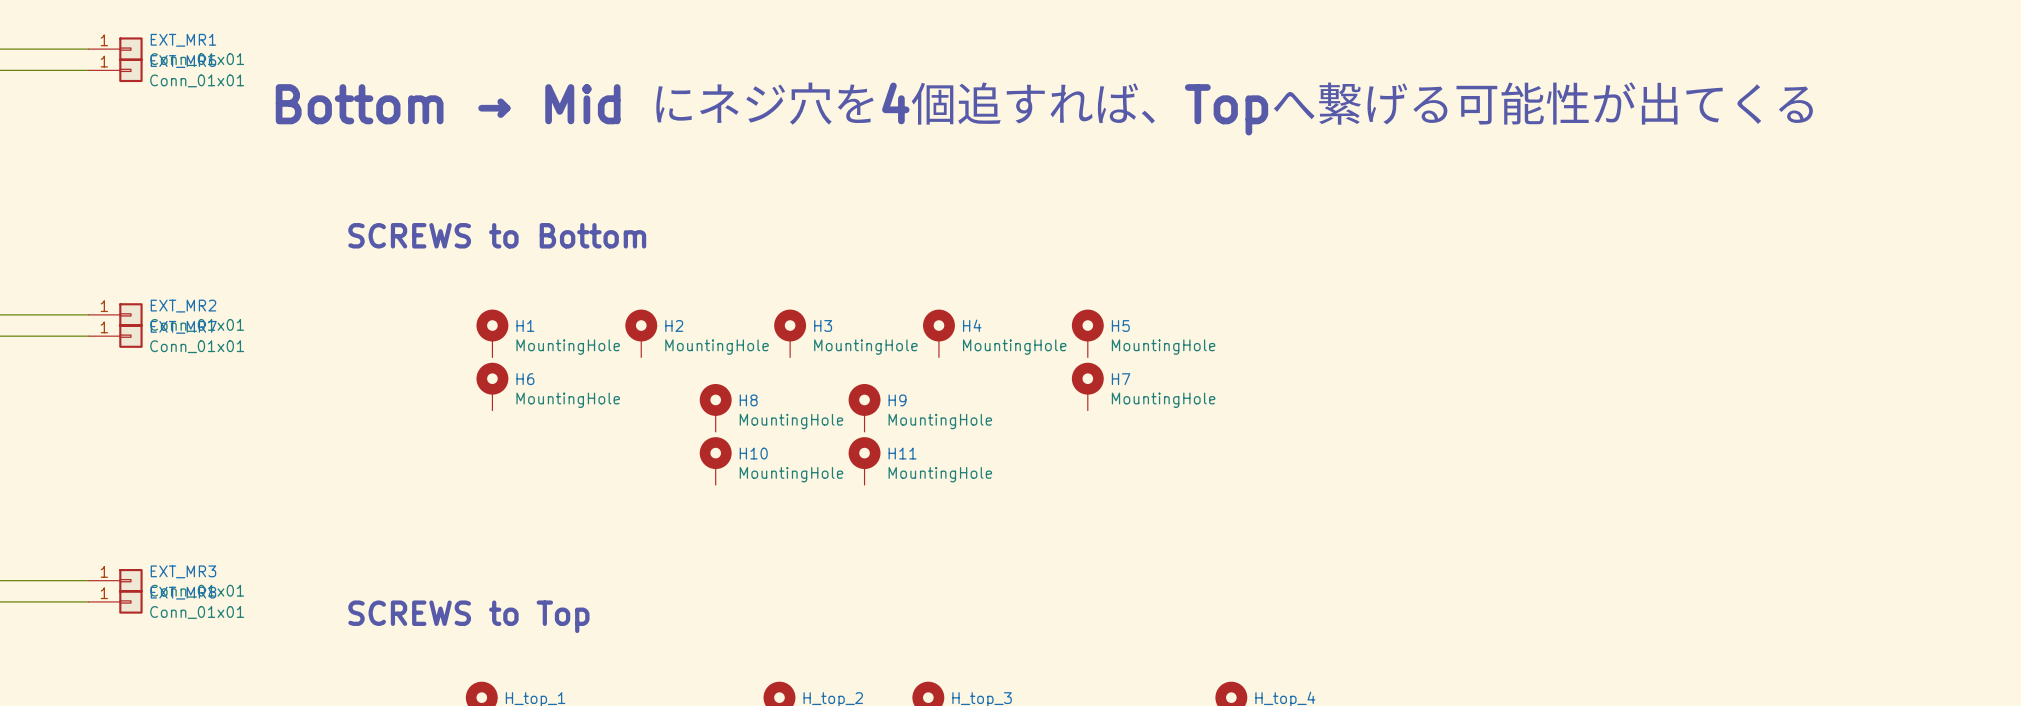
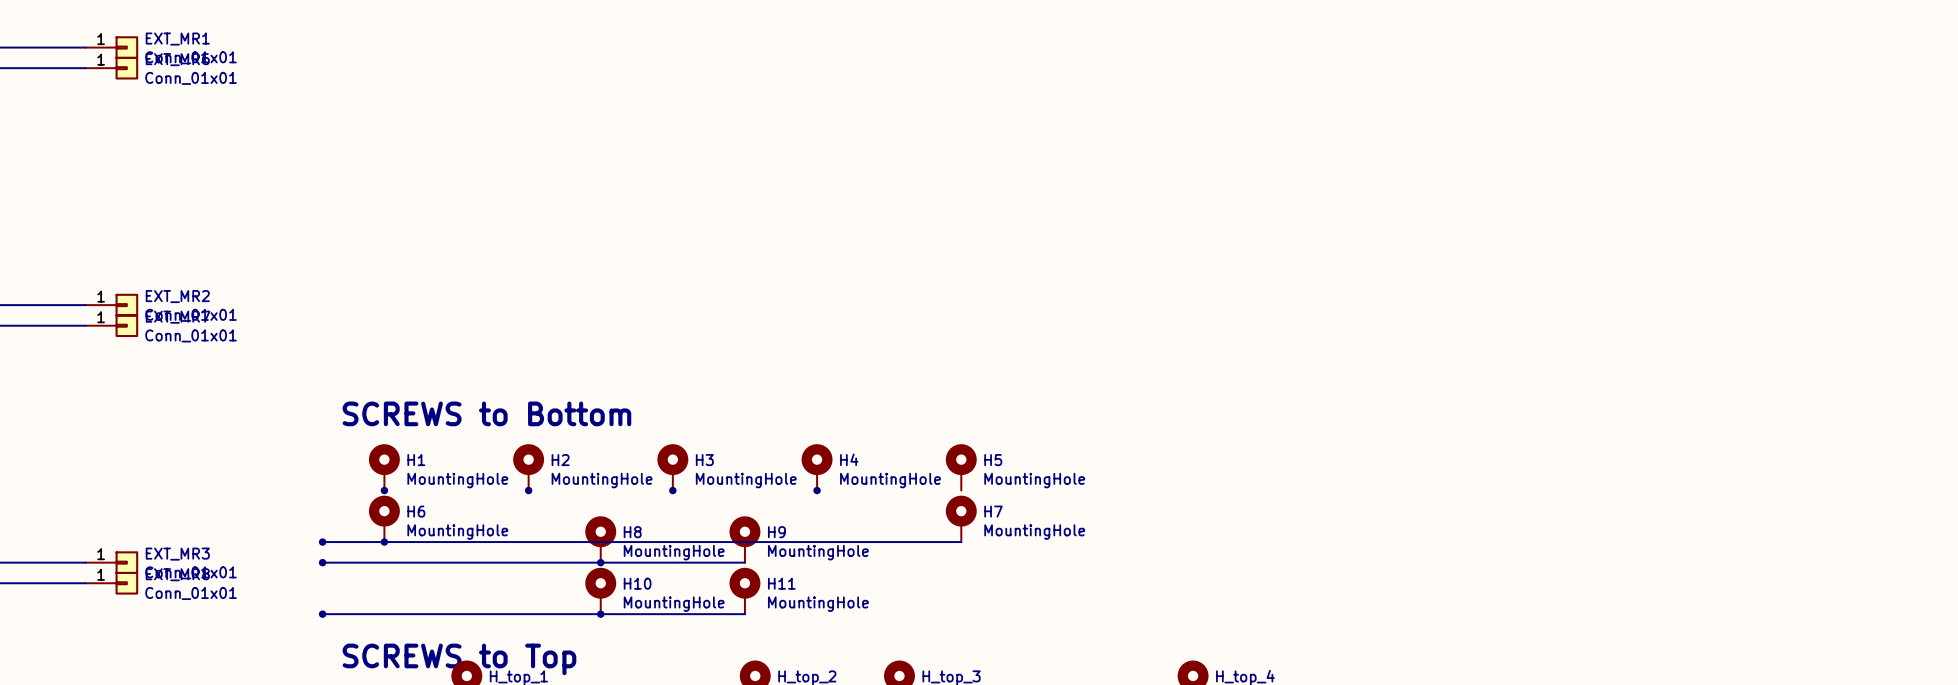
text: Bottom → Mid にネジ穴を4個追すれば、Topへ繋げる可能性が出てくる (1045, 107) -> none
text position: SCREWS to Bottom (497, 235) -> SCREWS to Bottom (486, 413)
H1 position: (492, 333) -> (384, 467)
H2 position: (641, 333) -> (528, 467)
H3 position: (790, 333) -> (672, 467)
H4 position: (938, 333) -> (817, 467)
H5 position: (1087, 333) -> (961, 467)
H6 position: (492, 386) -> (384, 518)
H7 position: (1087, 386) -> (961, 518)
H8 position: (715, 407) -> (600, 539)
H9 position: (864, 407) -> (744, 539)
H10 position: (715, 461) -> (600, 590)
H11 position: (864, 461) -> (744, 590)
junction: none -> (384, 490)
junction: none -> (528, 490)
junction: none -> (672, 490)
junction: none -> (817, 490)
wire: none -> (322, 542) (961, 542)
junction: none -> (322, 542)
junction: none -> (384, 542)
wire: none -> (322, 562) (744, 562)
junction: none -> (322, 562)
junction: none -> (600, 562)
text position: SCREWS to Top (468, 616) -> SCREWS to Top (459, 659)
wire: none -> (322, 614) (744, 614)
junction: none -> (322, 614)
junction: none -> (600, 614)

